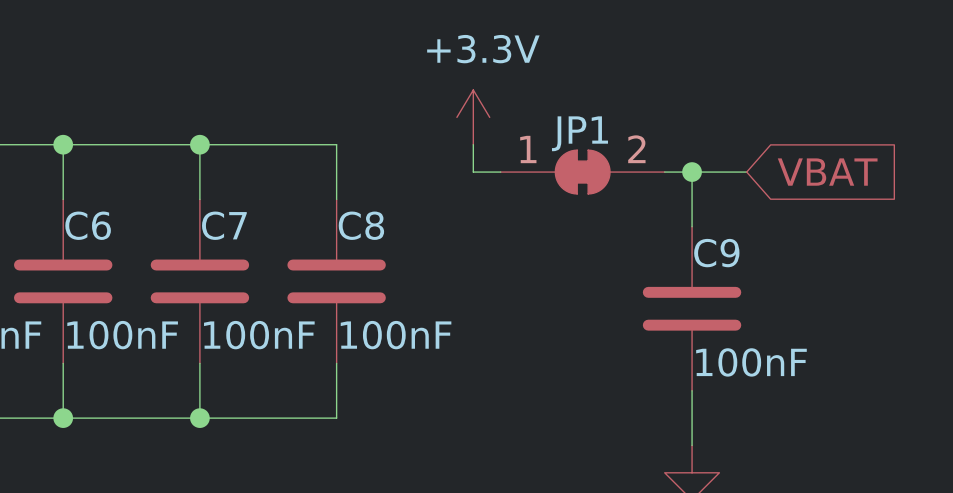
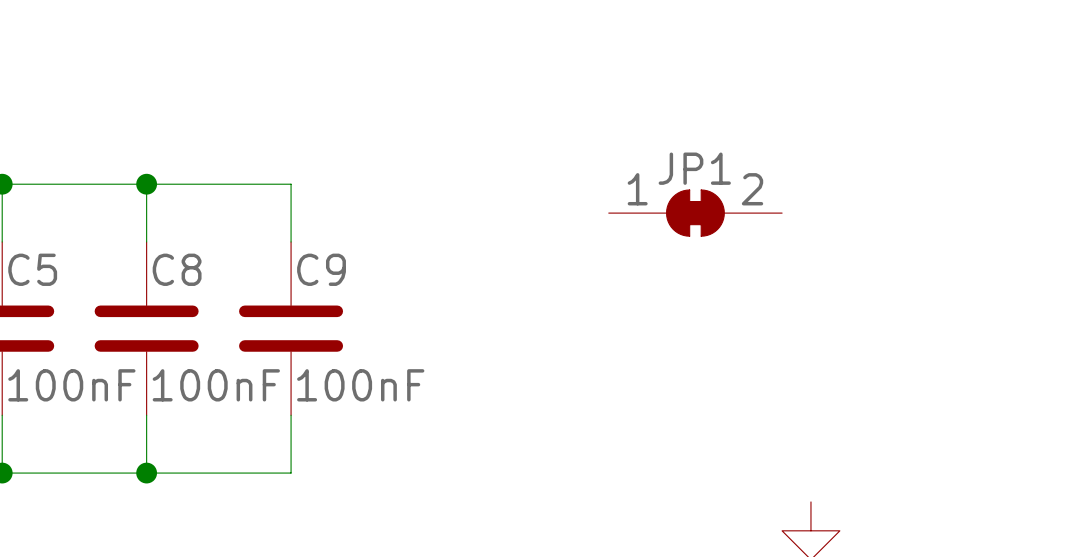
power symbol: +3.3V (473, 117) -> none
wire: (199, 144) (336, 144) (336, 199) -> none
junction: (199, 144) -> none
wire: (473, 144) (473, 172) (500, 172) -> none
wire: (664, 172) (746, 172) -> none
wire: (692, 172) (692, 226) -> none
junction: (692, 172) -> none
global label: VBAT (827, 172) -> none
C6 name: C6 (88, 225) -> C8 (177, 269)
C7 name: C7 (224, 225) -> C9 (321, 269)
C8: (336, 281) -> none
C9: (692, 308) -> none
wire: (336, 363) (336, 418) (199, 418) -> none
wire: (692, 390) (692, 445) -> none
junction: (199, 418) -> none

